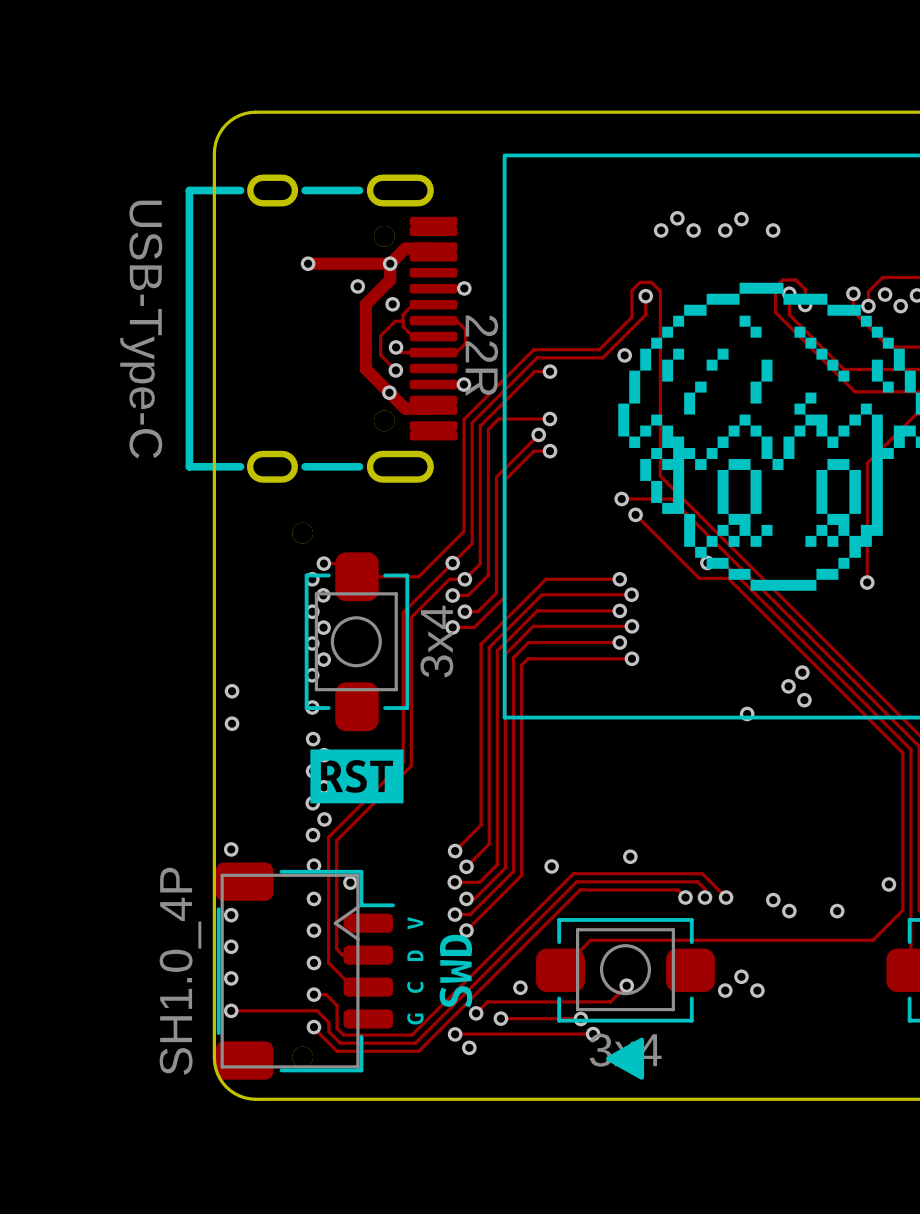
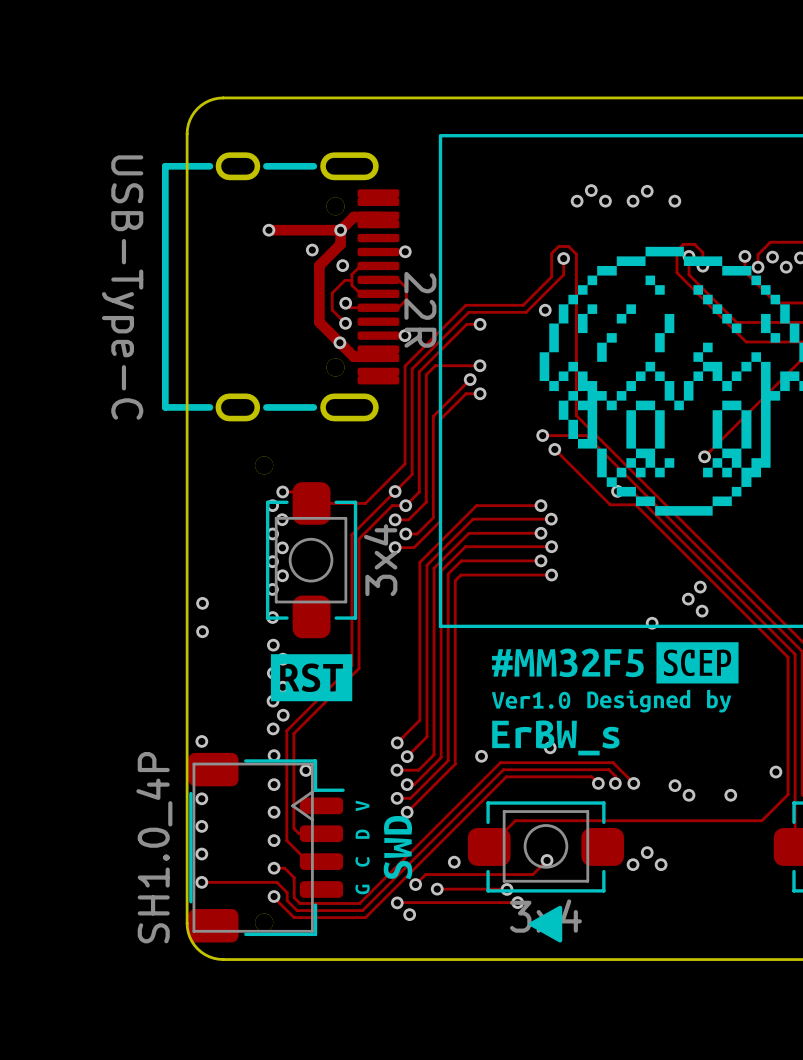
track: (867, 463) (867, 582) -> (756, 404) (704, 456)
via position: (867, 582) -> (704, 456)
drawing: none -> [491, 642, 739, 756]

